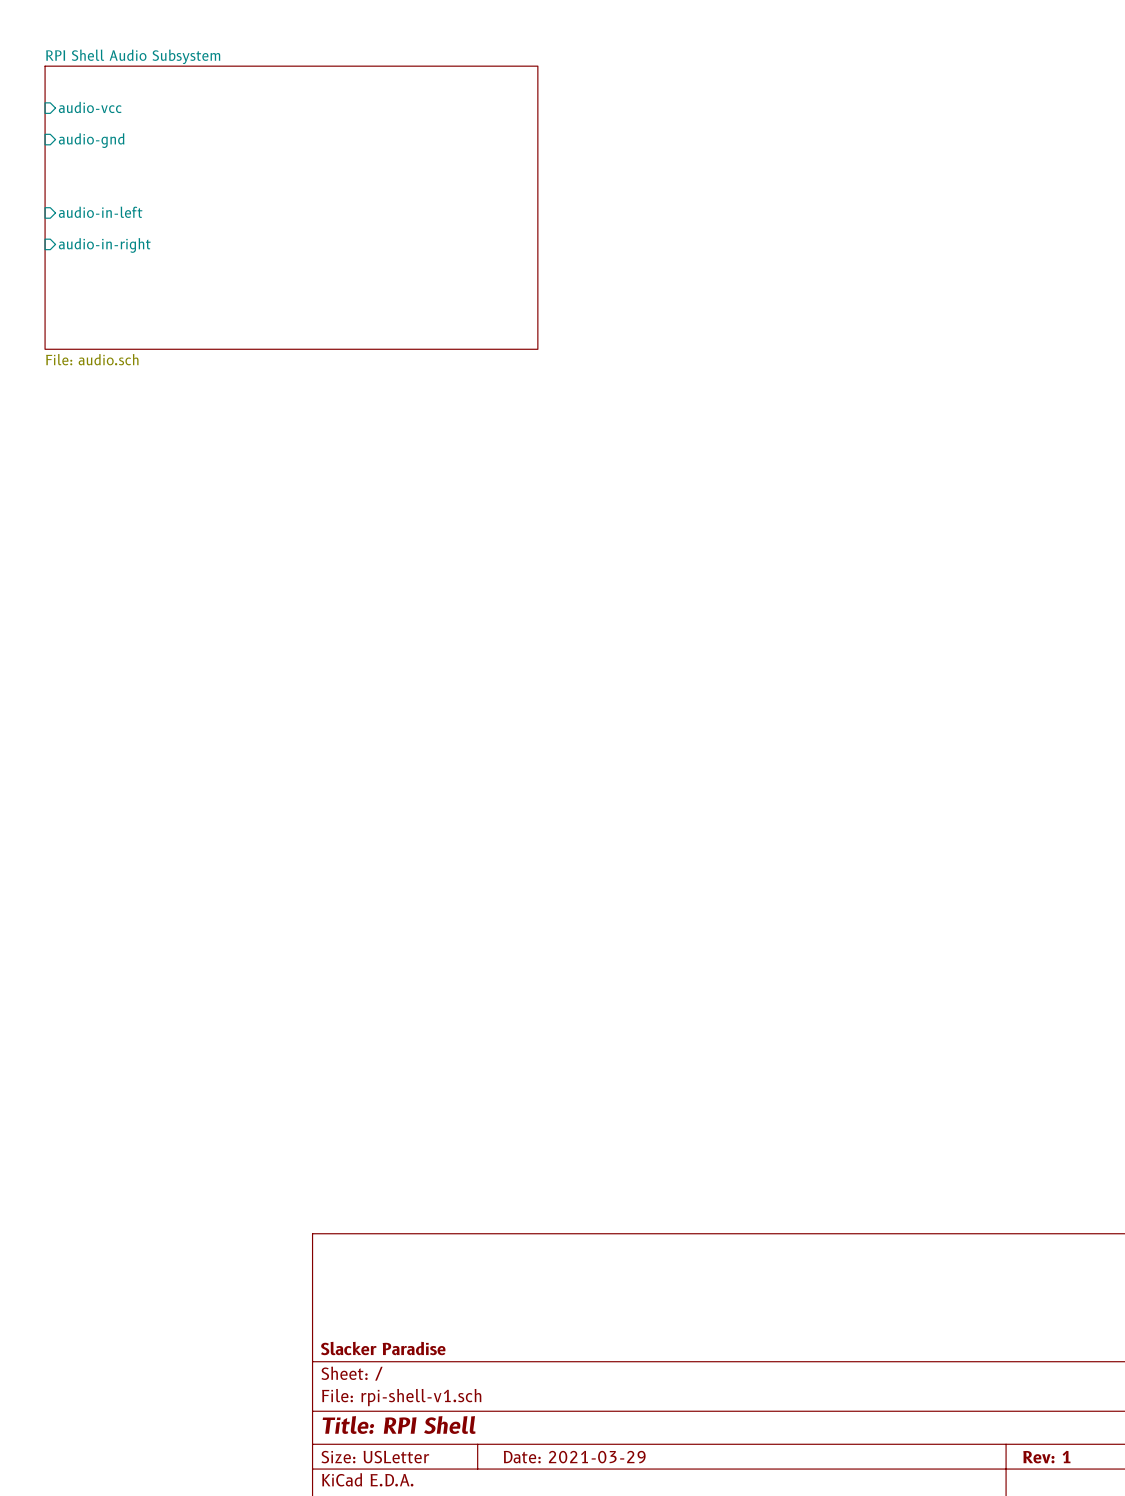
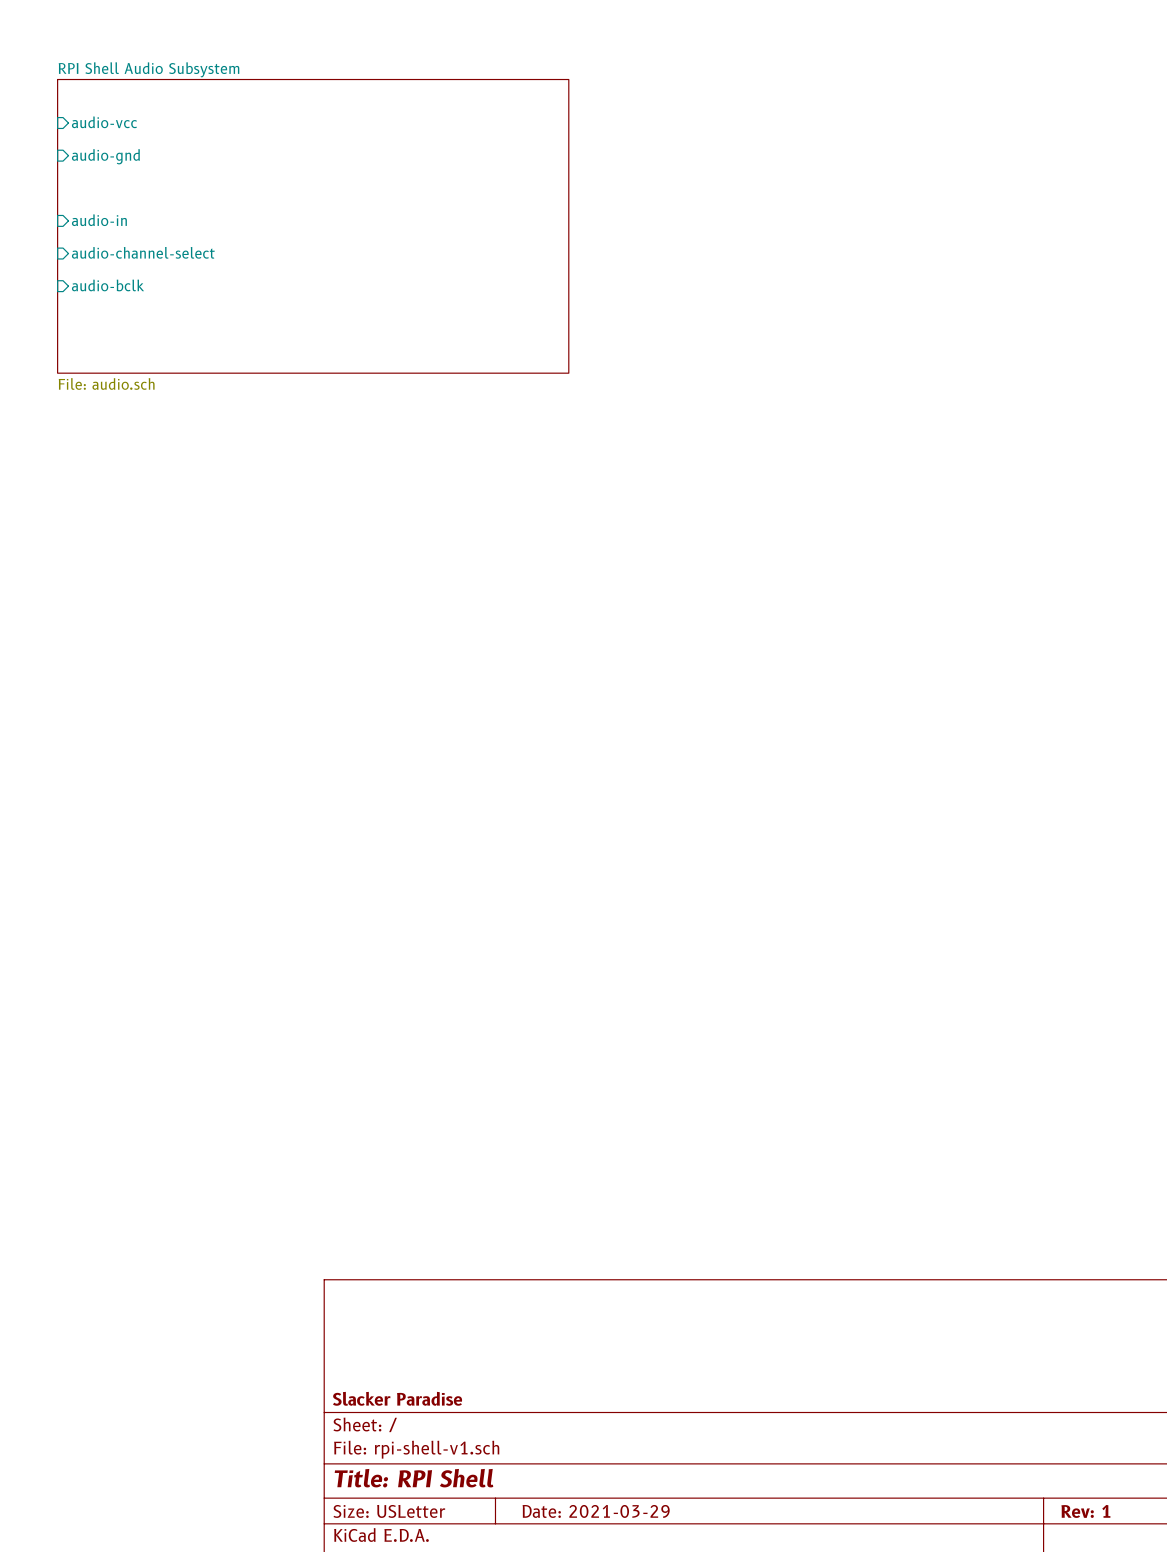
sheet pin position: audio-vcc (90, 107) -> audio-vcc (104, 122)
sheet pin position: audio-gnd (91, 140) -> audio-gnd (105, 156)
sheet RPI Shell Audio Subsystem position: (291, 207) -> (313, 226)
sheet pin: audio-in-left (100, 212) -> audio-in (99, 220)
sheet pin: none -> audio-channel-select (143, 252)
sheet pin: audio-in-right (104, 245) -> none
sheet pin: none -> audio-bclk (107, 285)

